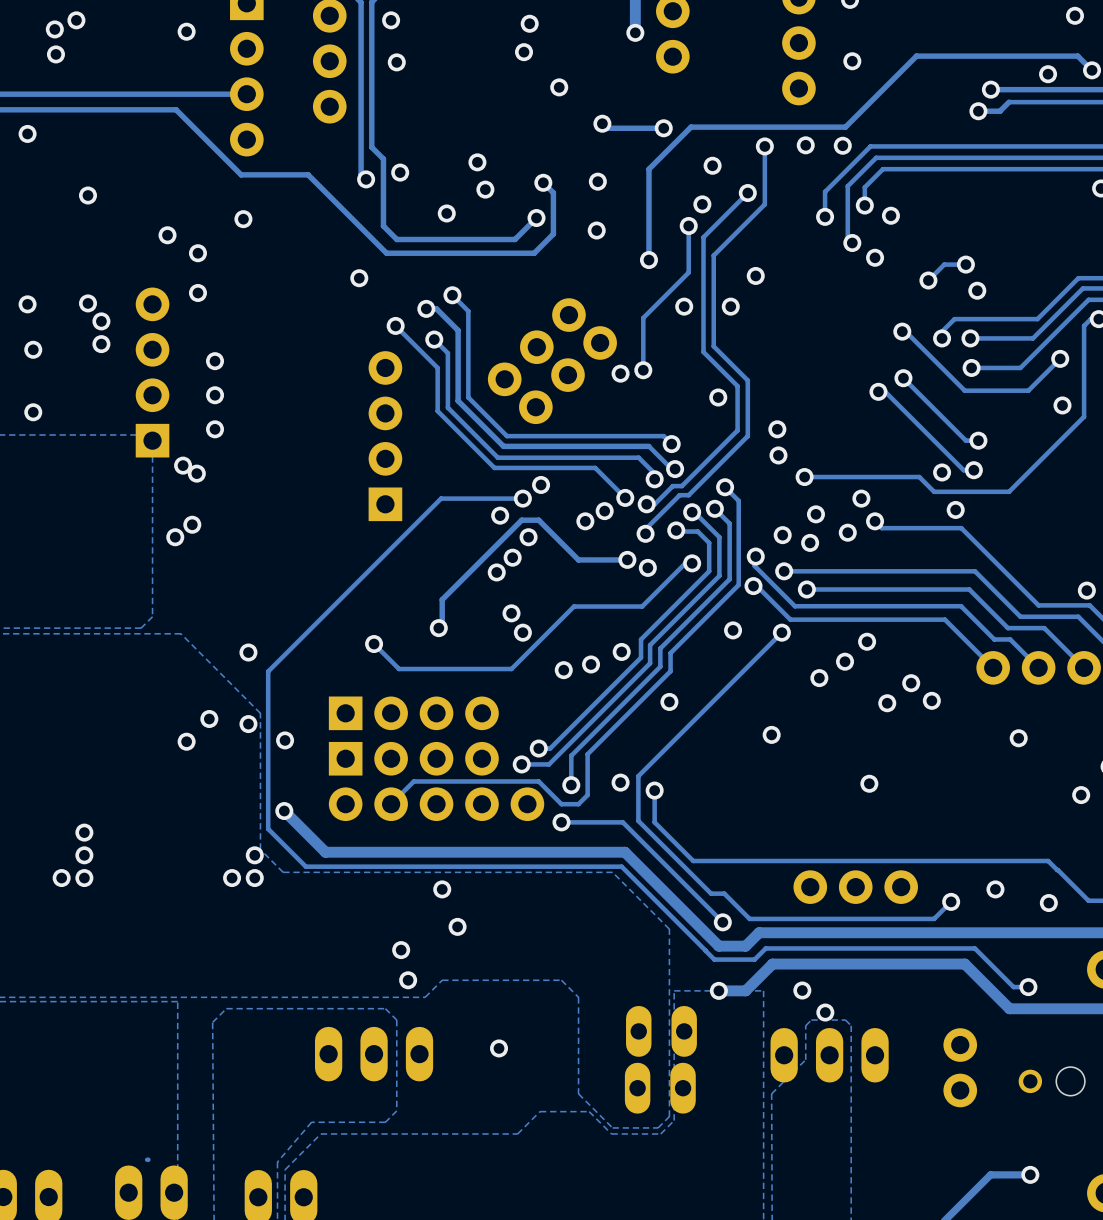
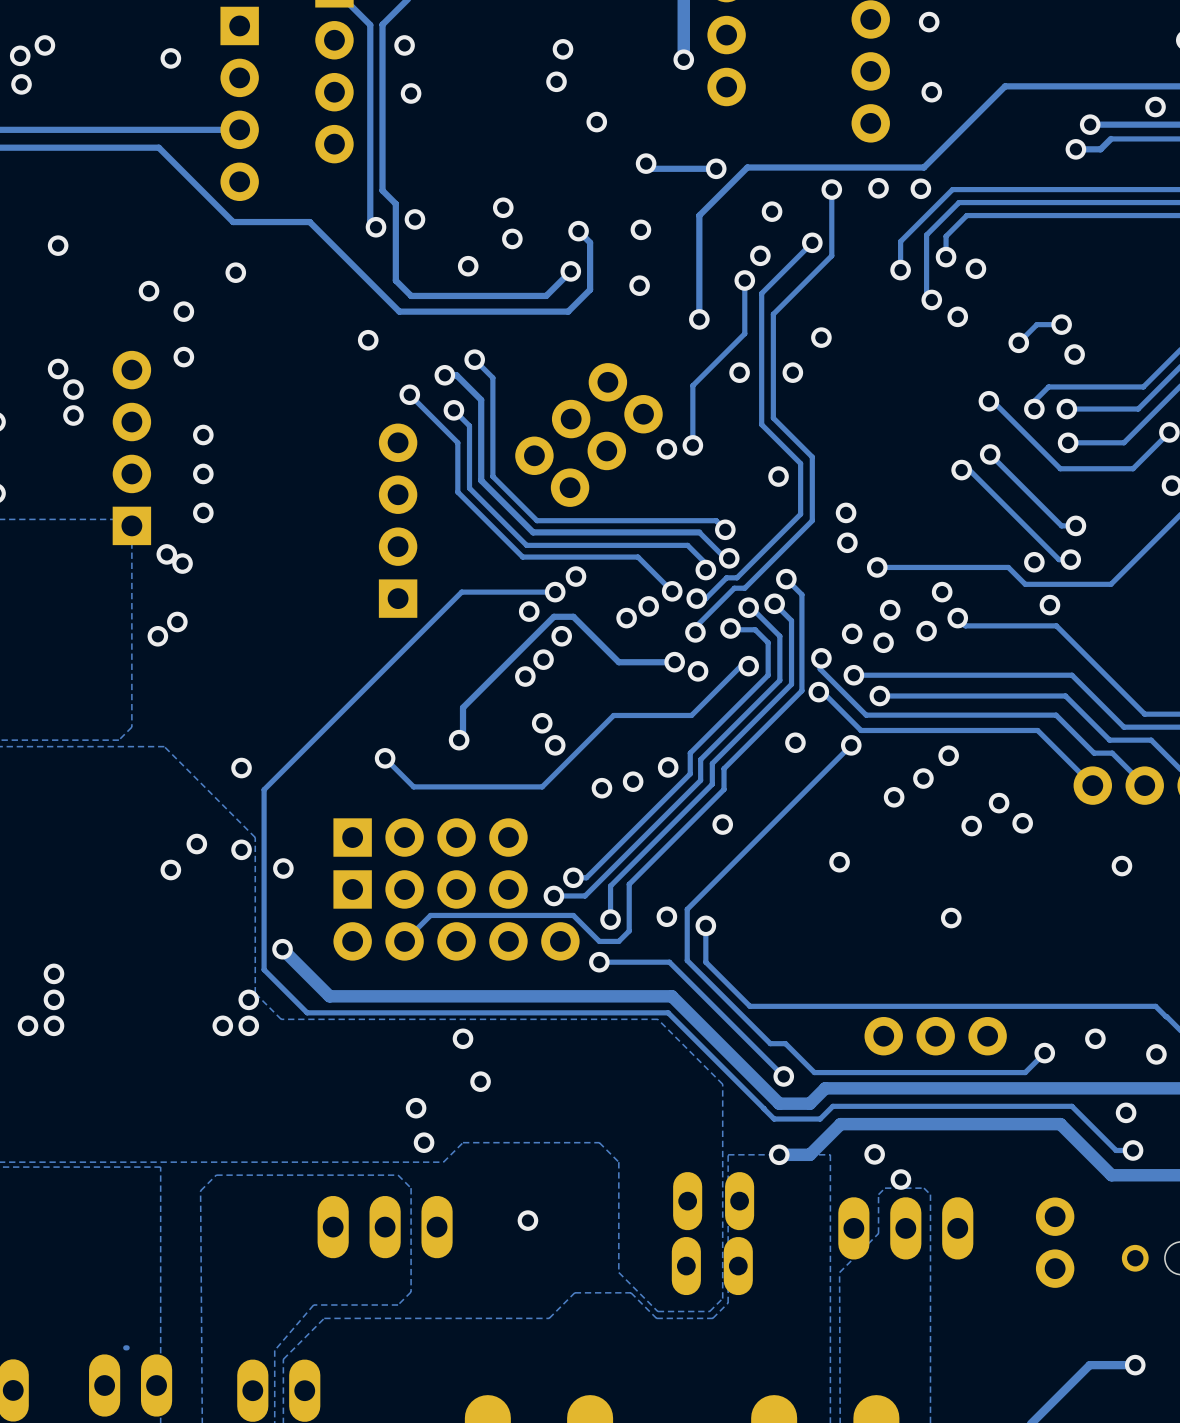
via: none -> (1126, 1112)

